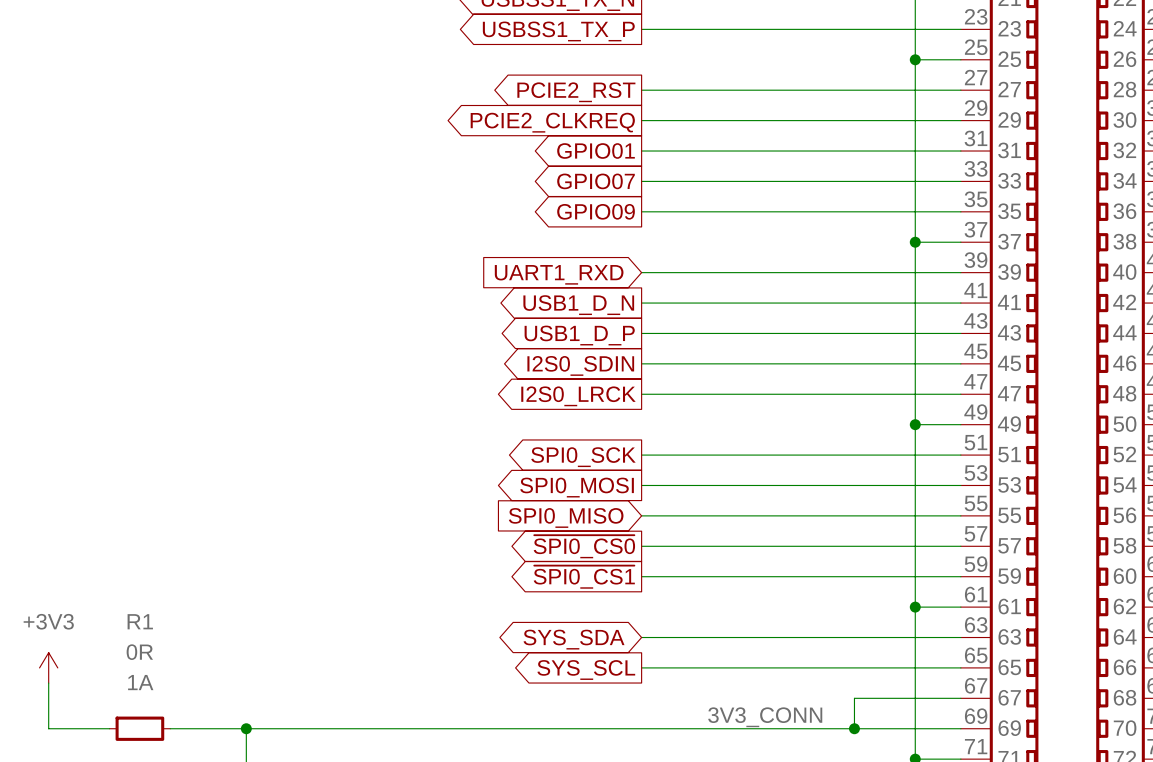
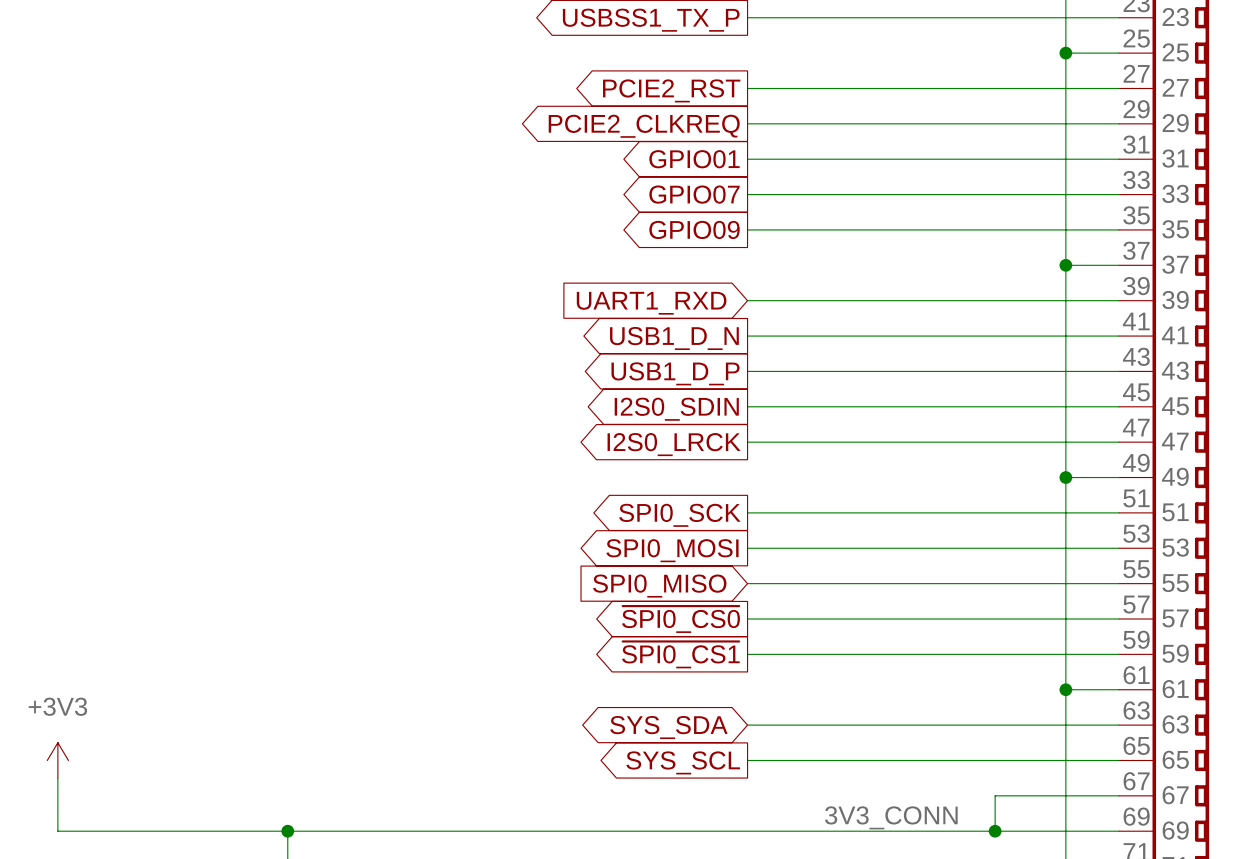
wire: none -> (128, 831) (199, 831)
R1: (139, 728) -> none

